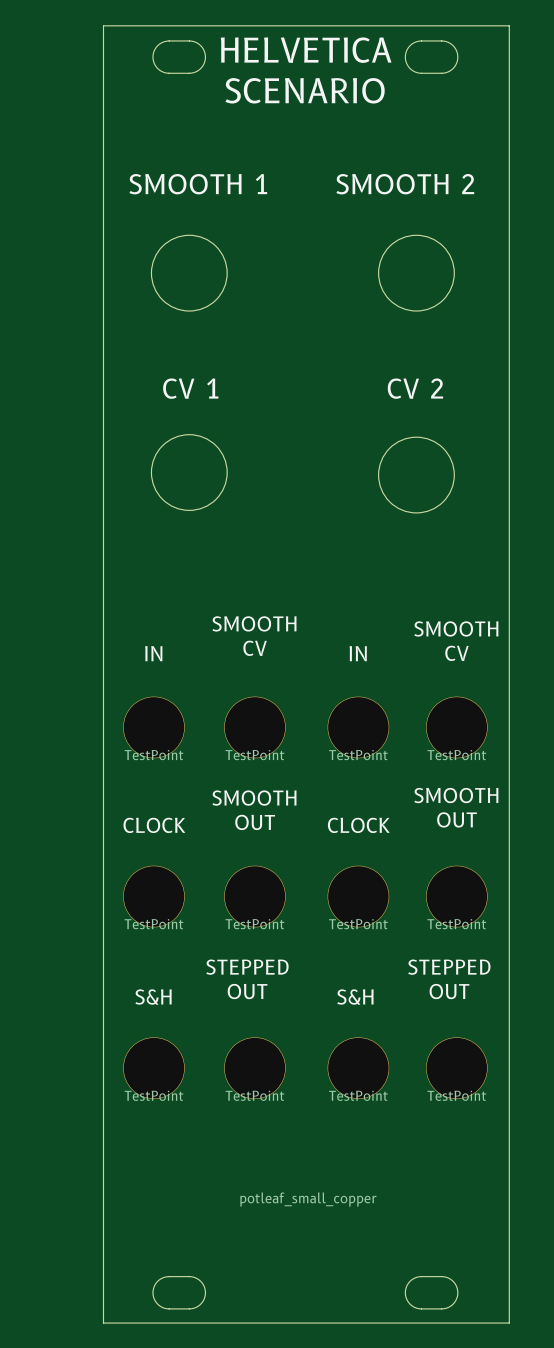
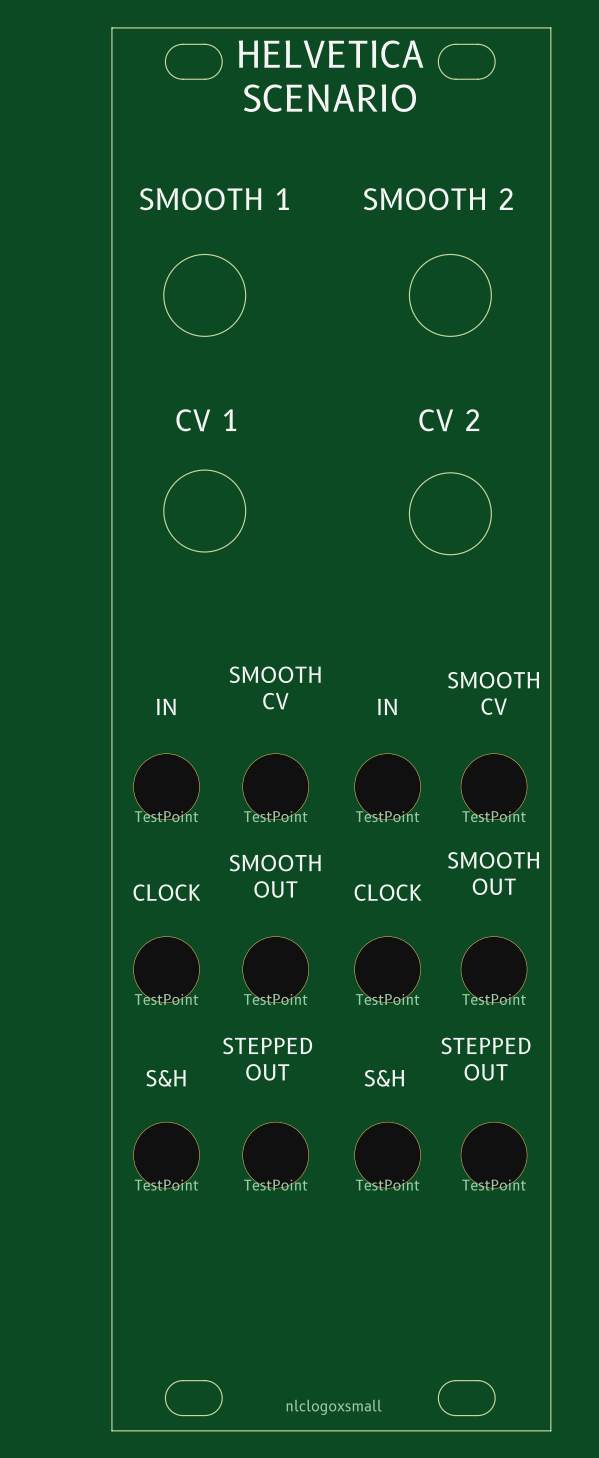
drawing: [240, 1192, 377, 1207] -> none
drawing: none -> [286, 1399, 382, 1416]

